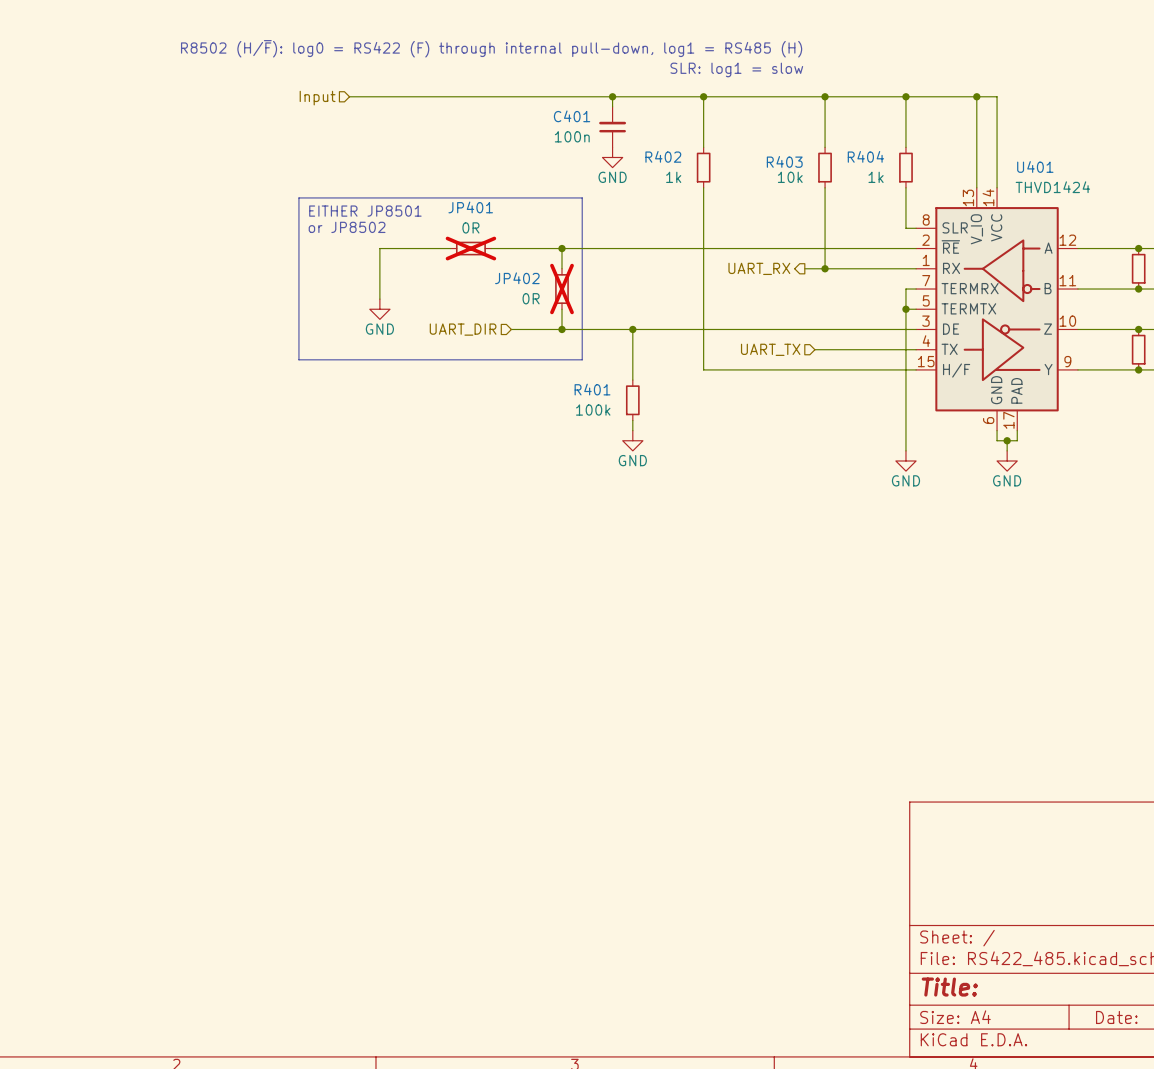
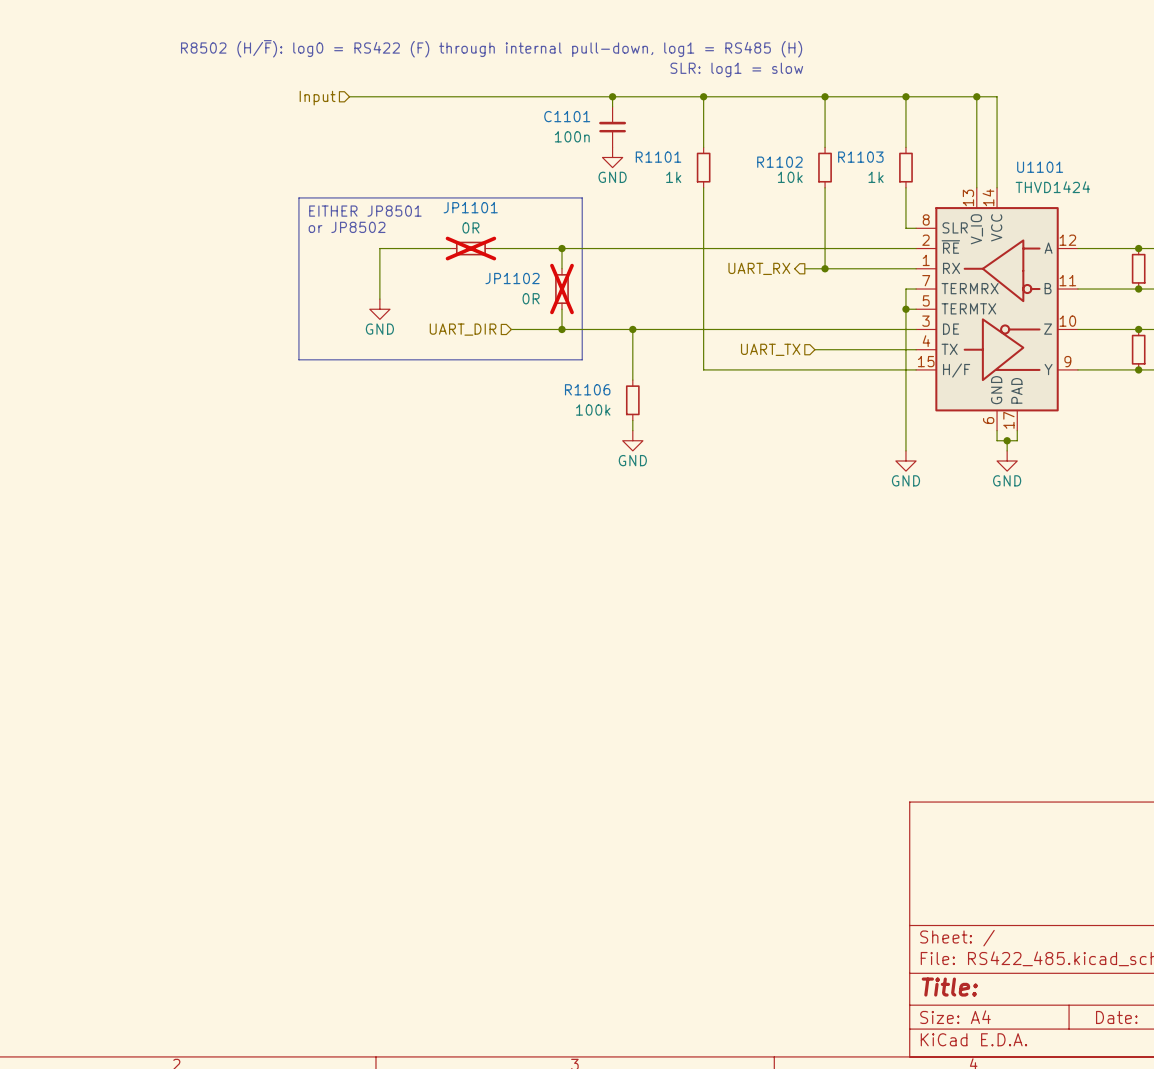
C401 name: C401 (572, 116) -> C1101 (567, 116)
R402 name: R402 (663, 156) -> R1101 (658, 157)
R404 name: R404 (865, 156) -> R1103 (860, 157)
R403 name: R403 (784, 161) -> R1102 (779, 162)
U401 name: U401 (1035, 166) -> U1101 (1040, 167)
JP401 name: JP401 (470, 207) -> JP1101 (470, 207)
JP402 name: JP402 (517, 278) -> JP1102 (512, 278)
R401 name: R401 (592, 389) -> R1106 (587, 389)

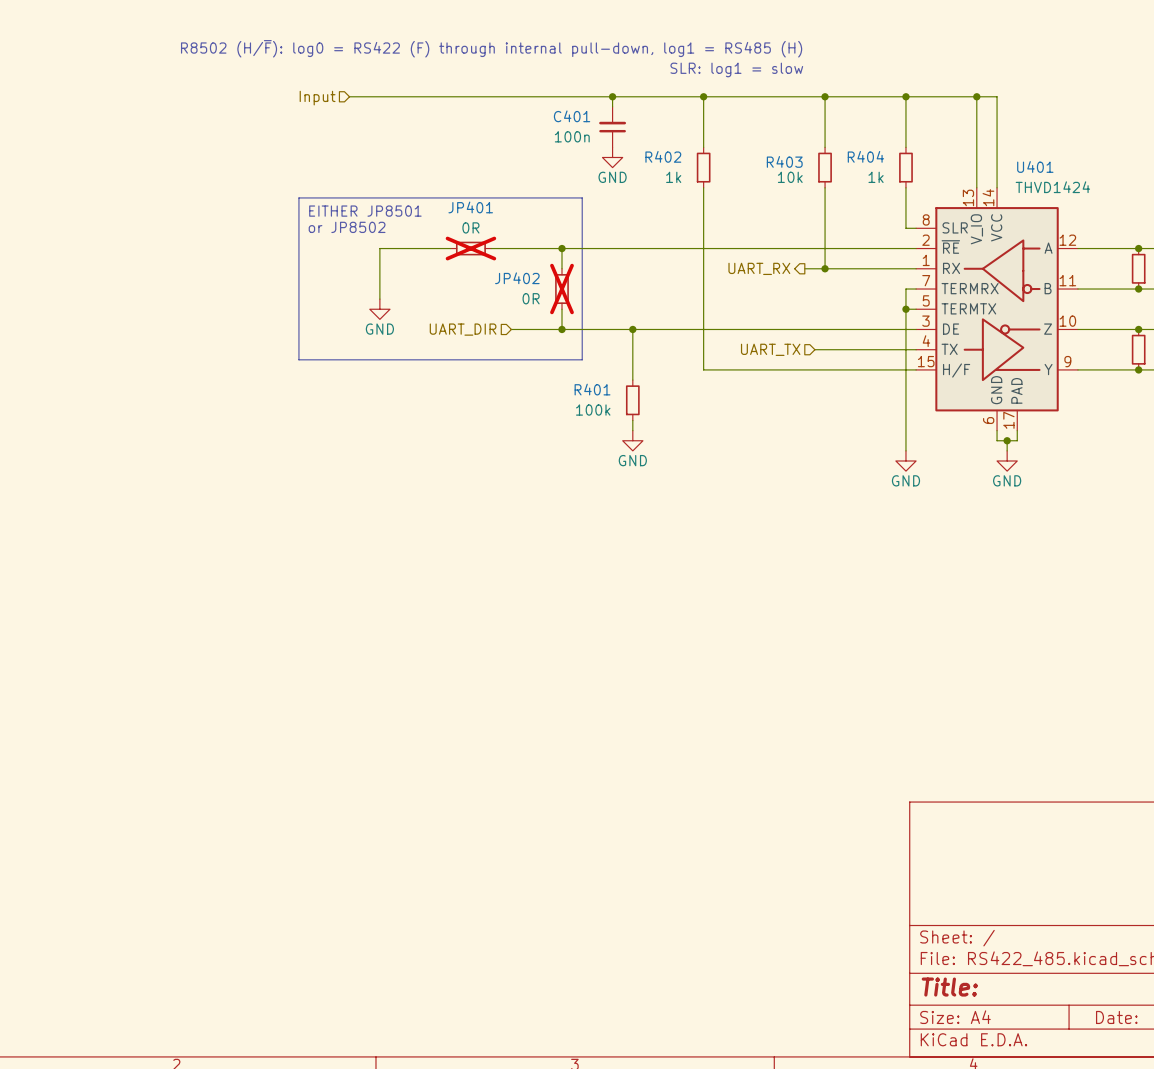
C1101 name: C1101 (567, 116) -> C401 (572, 116)
R1101 name: R1101 (658, 157) -> R402 (663, 156)
R1103 name: R1103 (860, 157) -> R404 (865, 156)
R1102 name: R1102 (779, 162) -> R403 (784, 161)
U1101 name: U1101 (1040, 167) -> U401 (1035, 166)
JP1101 name: JP1101 (470, 207) -> JP401 (470, 207)
JP1102 name: JP1102 (512, 278) -> JP402 (517, 278)
R1106 name: R1106 (587, 389) -> R401 (592, 389)

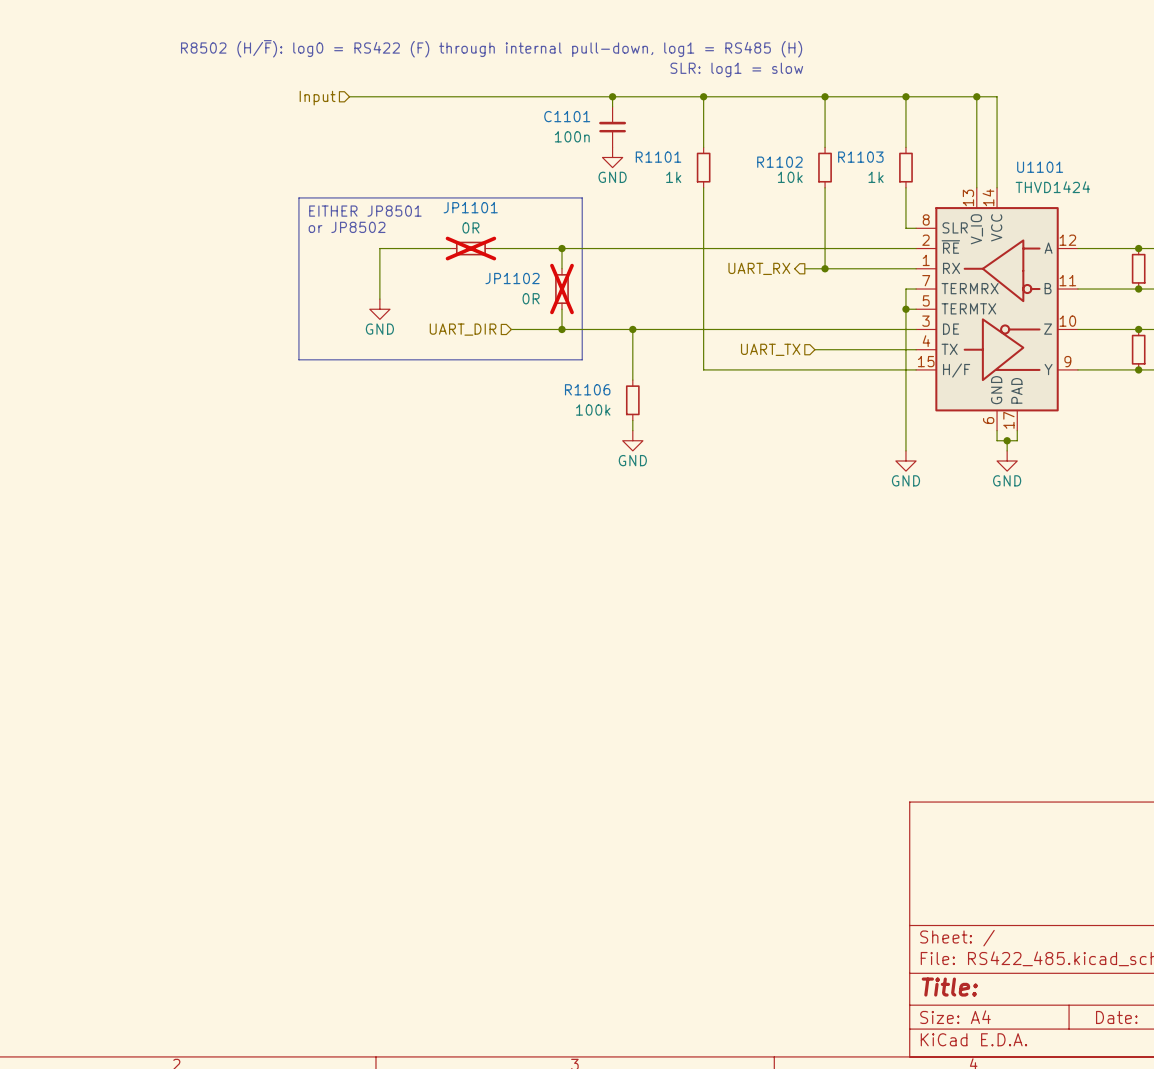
C401 name: C401 (572, 116) -> C1101 (567, 116)
R402 name: R402 (663, 156) -> R1101 (658, 157)
R404 name: R404 (865, 156) -> R1103 (860, 157)
R403 name: R403 (784, 161) -> R1102 (779, 162)
U401 name: U401 (1035, 166) -> U1101 (1040, 167)
JP401 name: JP401 (470, 207) -> JP1101 (470, 207)
JP402 name: JP402 (517, 278) -> JP1102 (512, 278)
R401 name: R401 (592, 389) -> R1106 (587, 389)

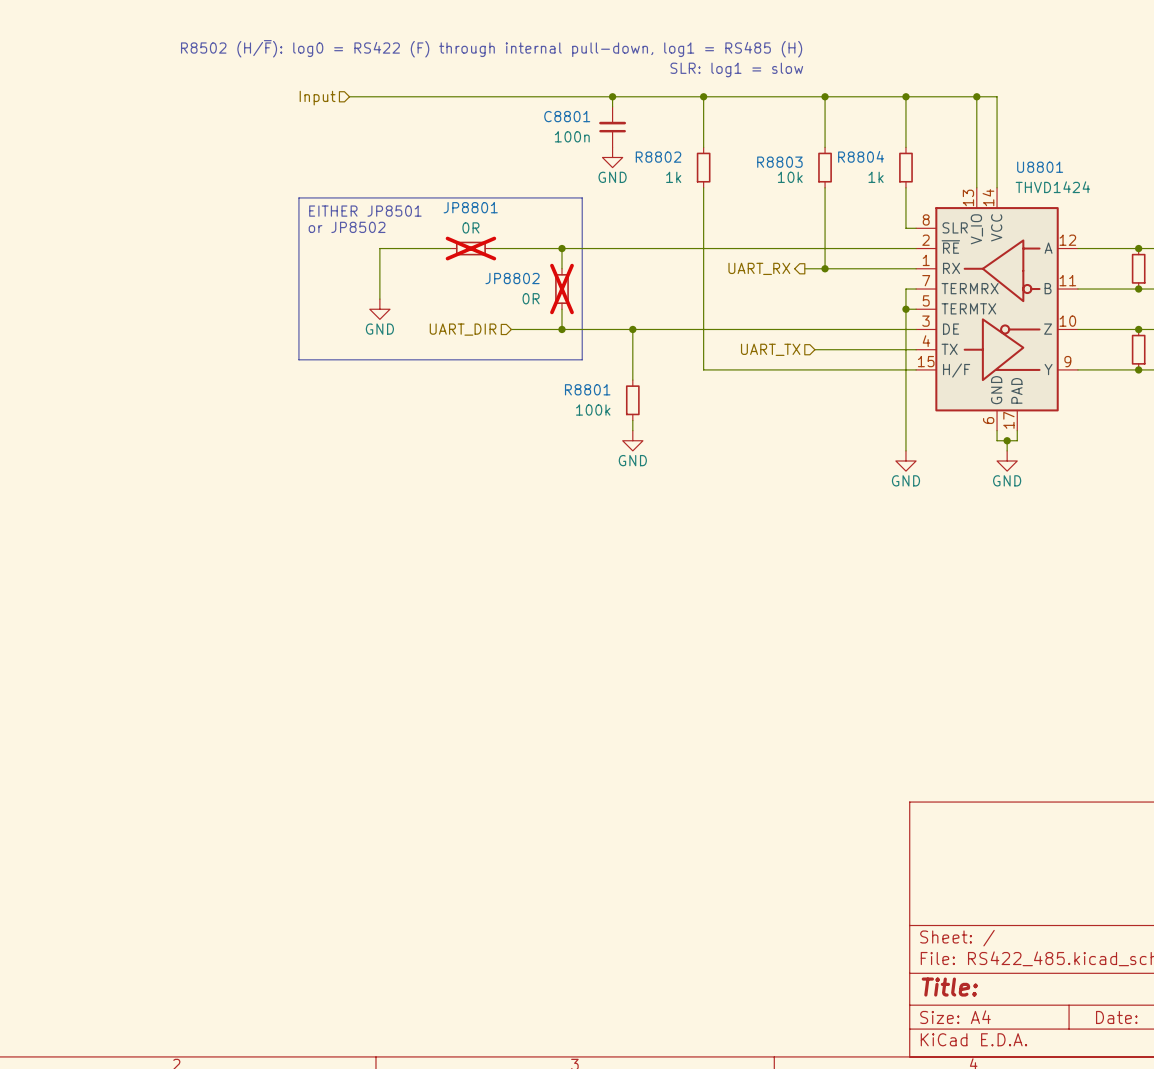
C1101 name: C1101 (567, 116) -> C8801 (567, 116)
R1101 name: R1101 (658, 157) -> R8802 (658, 157)
R1103 name: R1103 (860, 157) -> R8804 (861, 156)
R1102 name: R1102 (779, 162) -> R8803 (779, 162)
U1101 name: U1101 (1040, 167) -> U8801 (1040, 167)
JP1101 name: JP1101 (470, 207) -> JP8801 (470, 207)
JP1102 name: JP1102 (512, 278) -> JP8802 (512, 278)
R1106 name: R1106 (587, 389) -> R8801 (587, 389)

